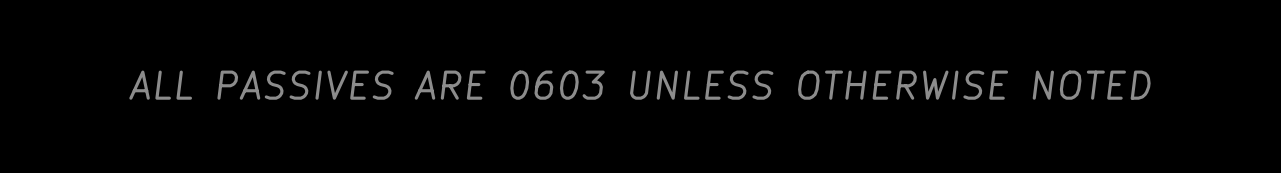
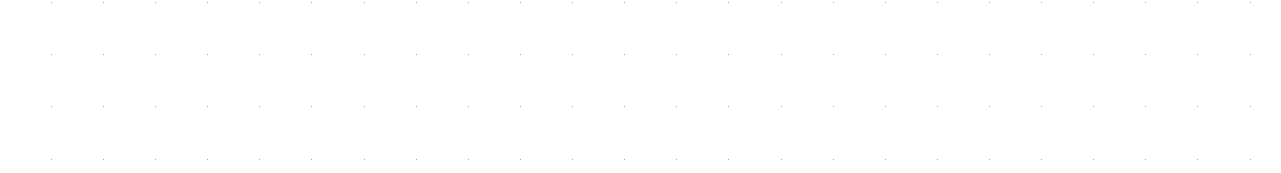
text: ALL PASSIVES ARE 0603 UNLESS OTHERWISE NOTED (639, 85) -> none

